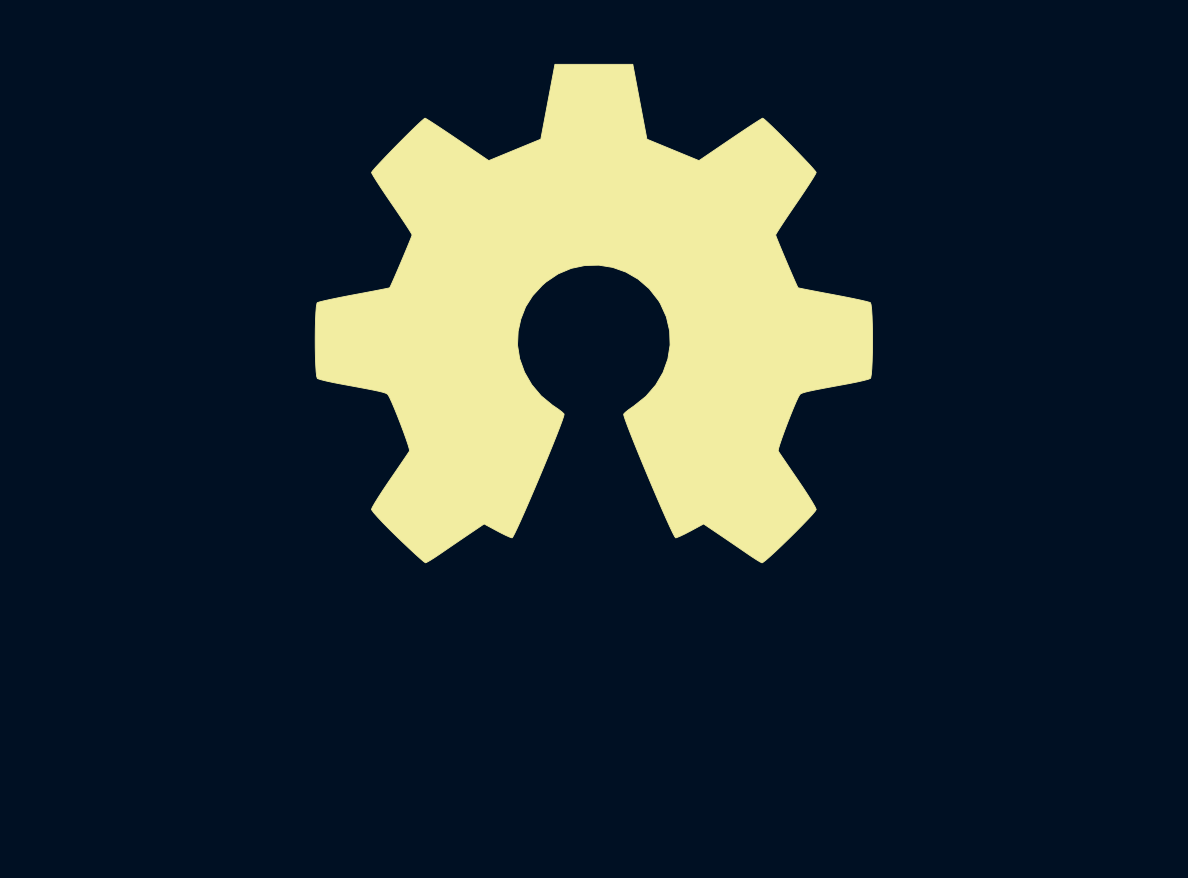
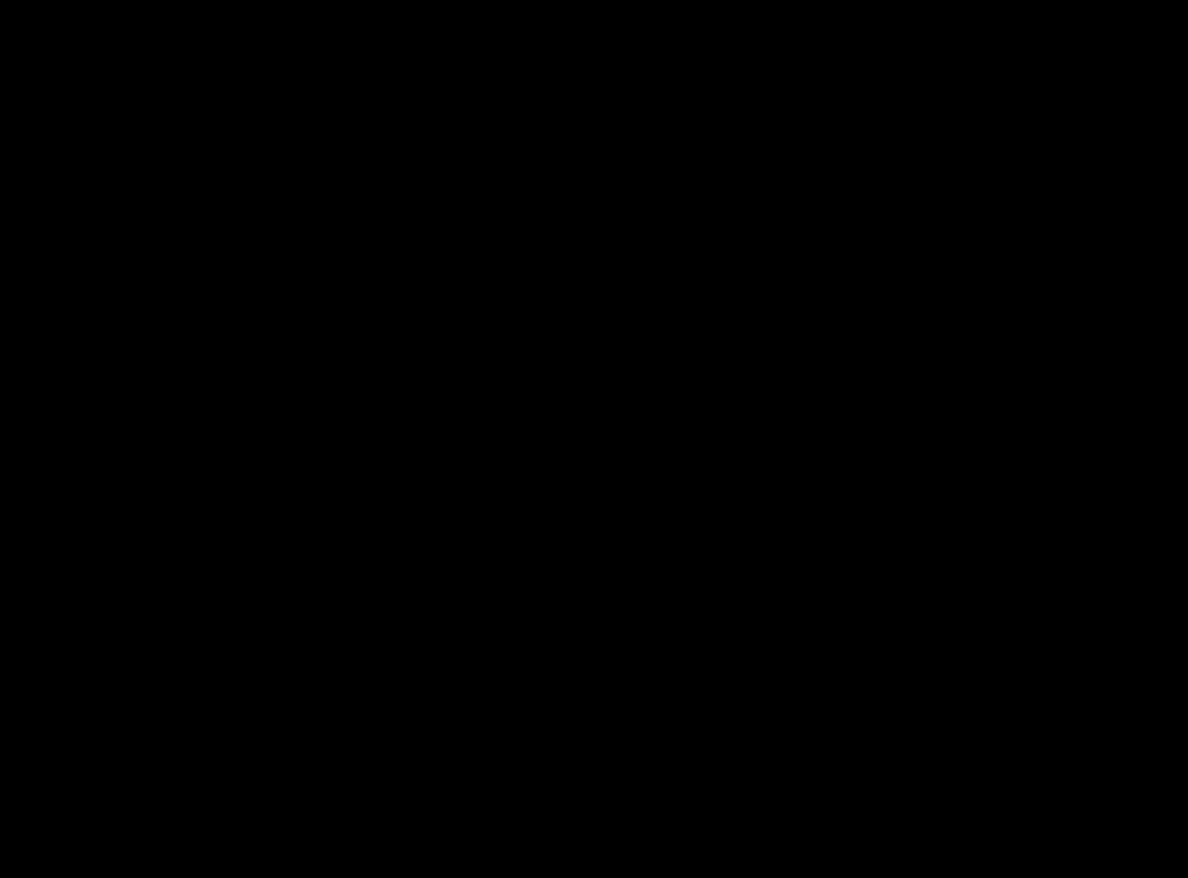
drawing: [314, 63, 873, 564] -> none

